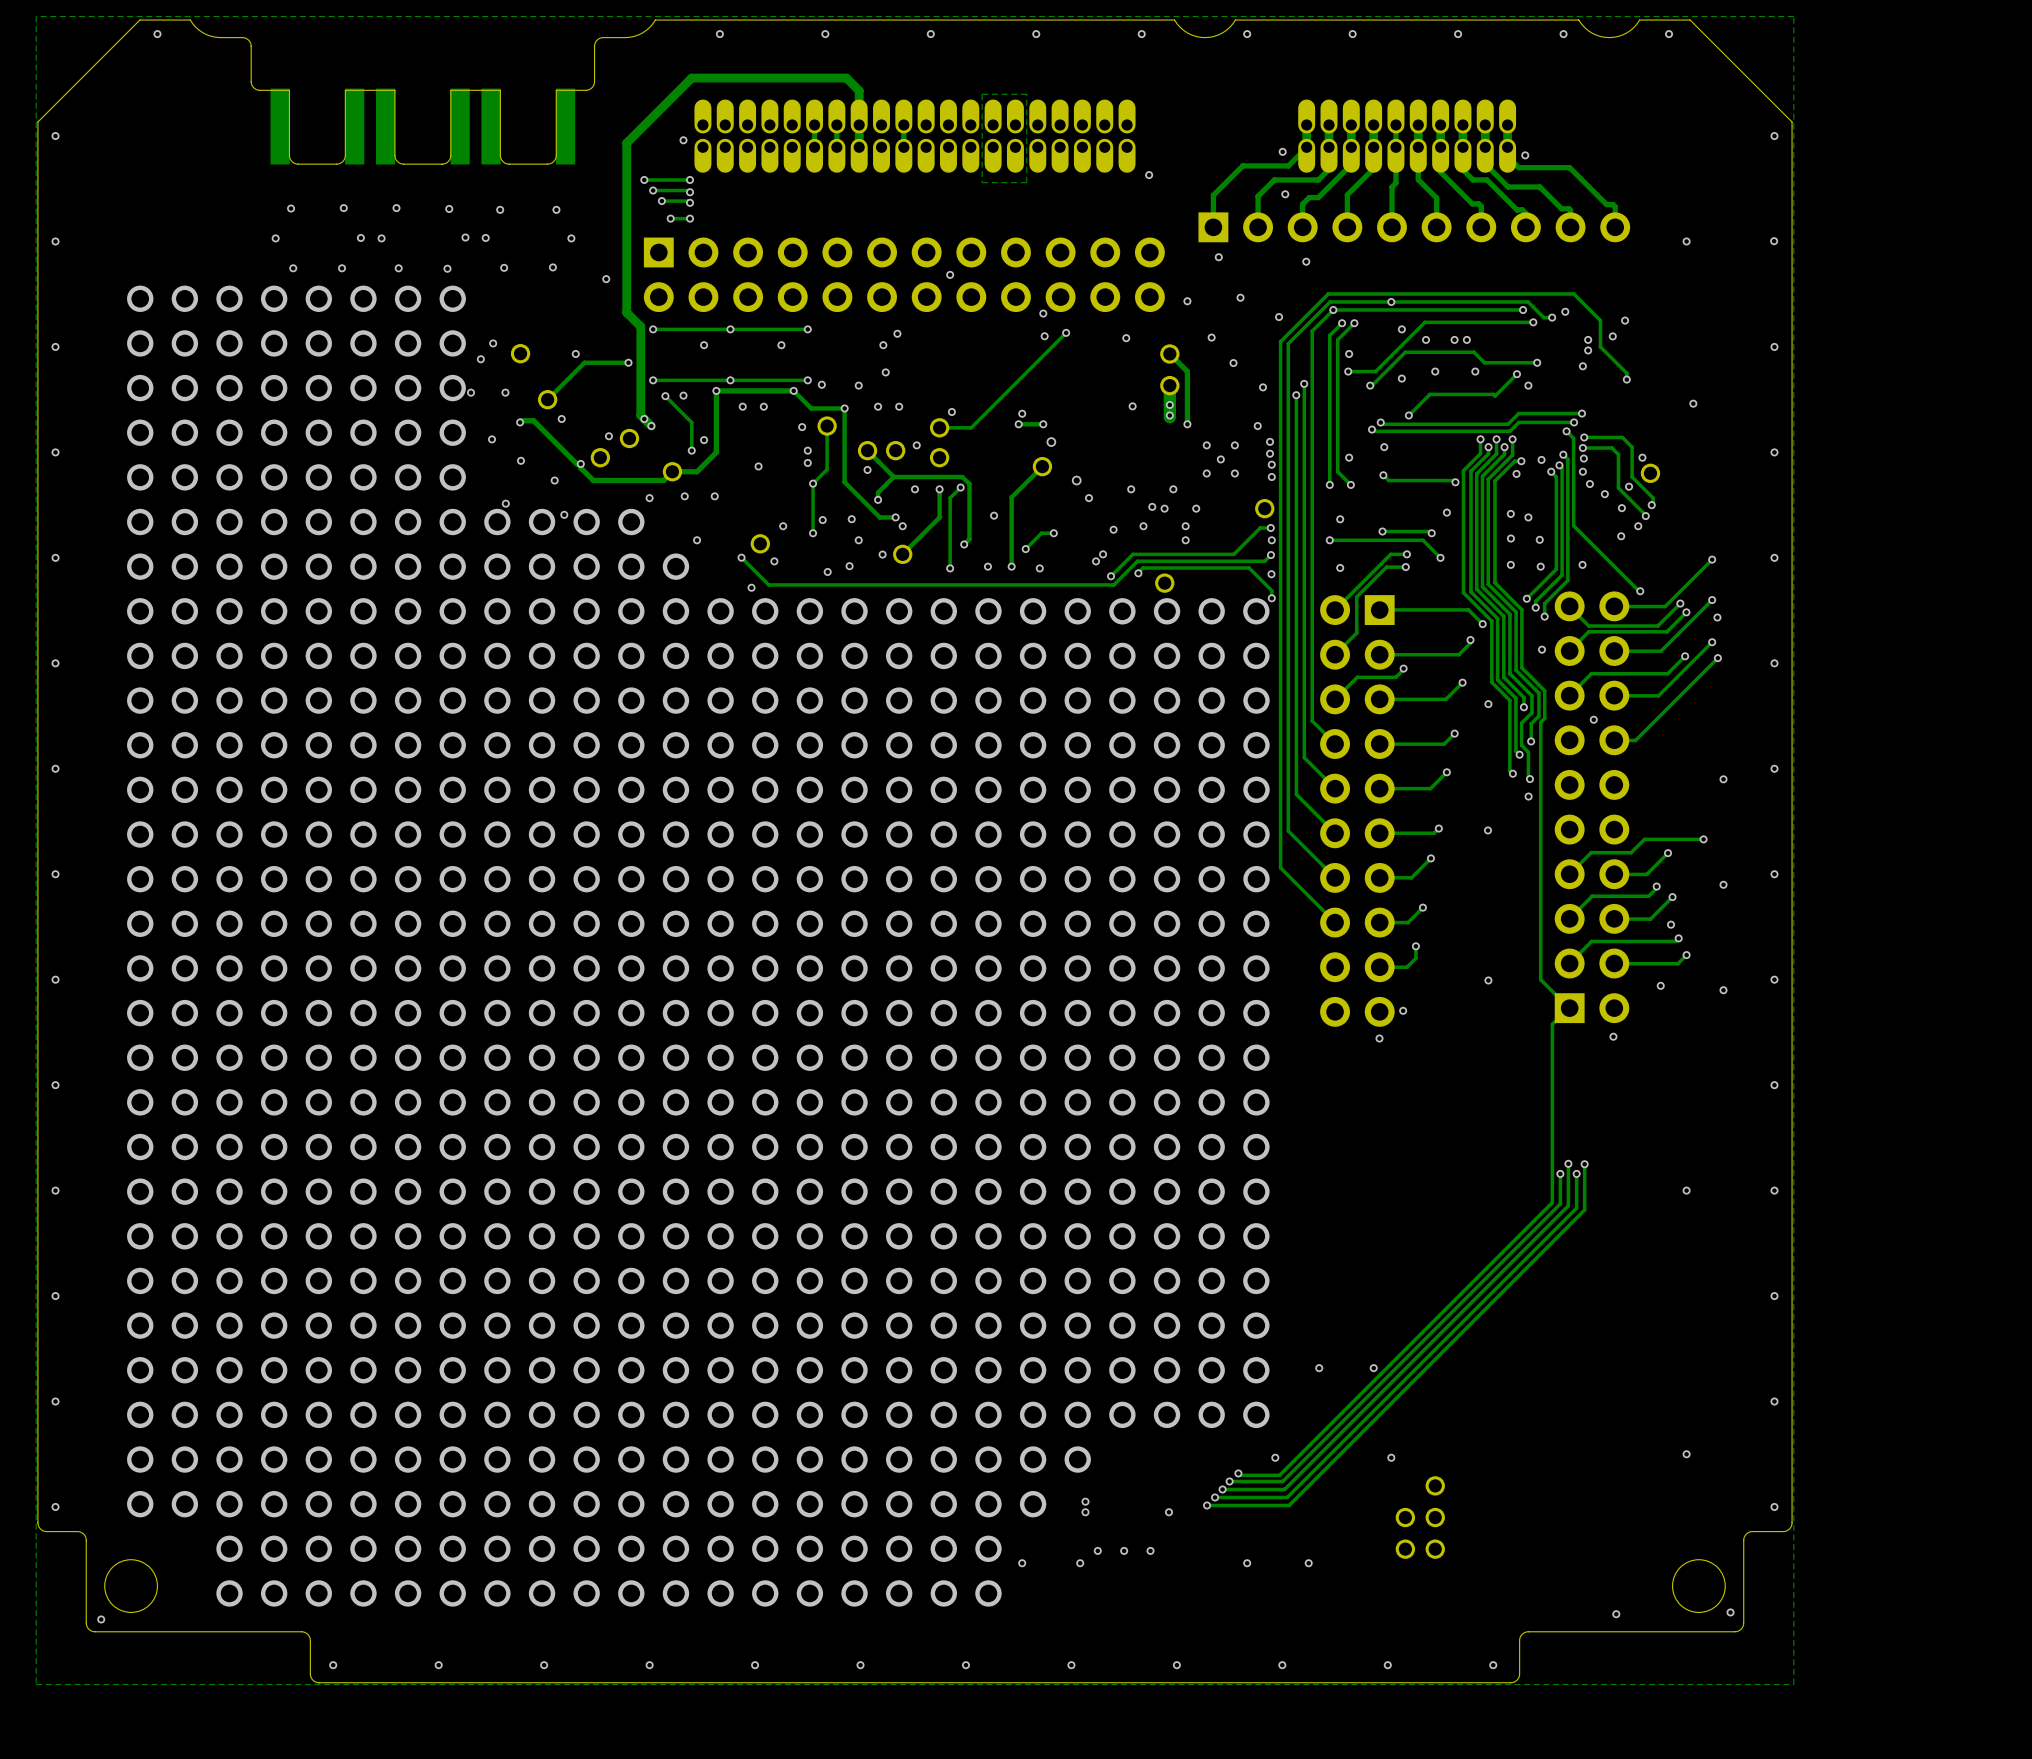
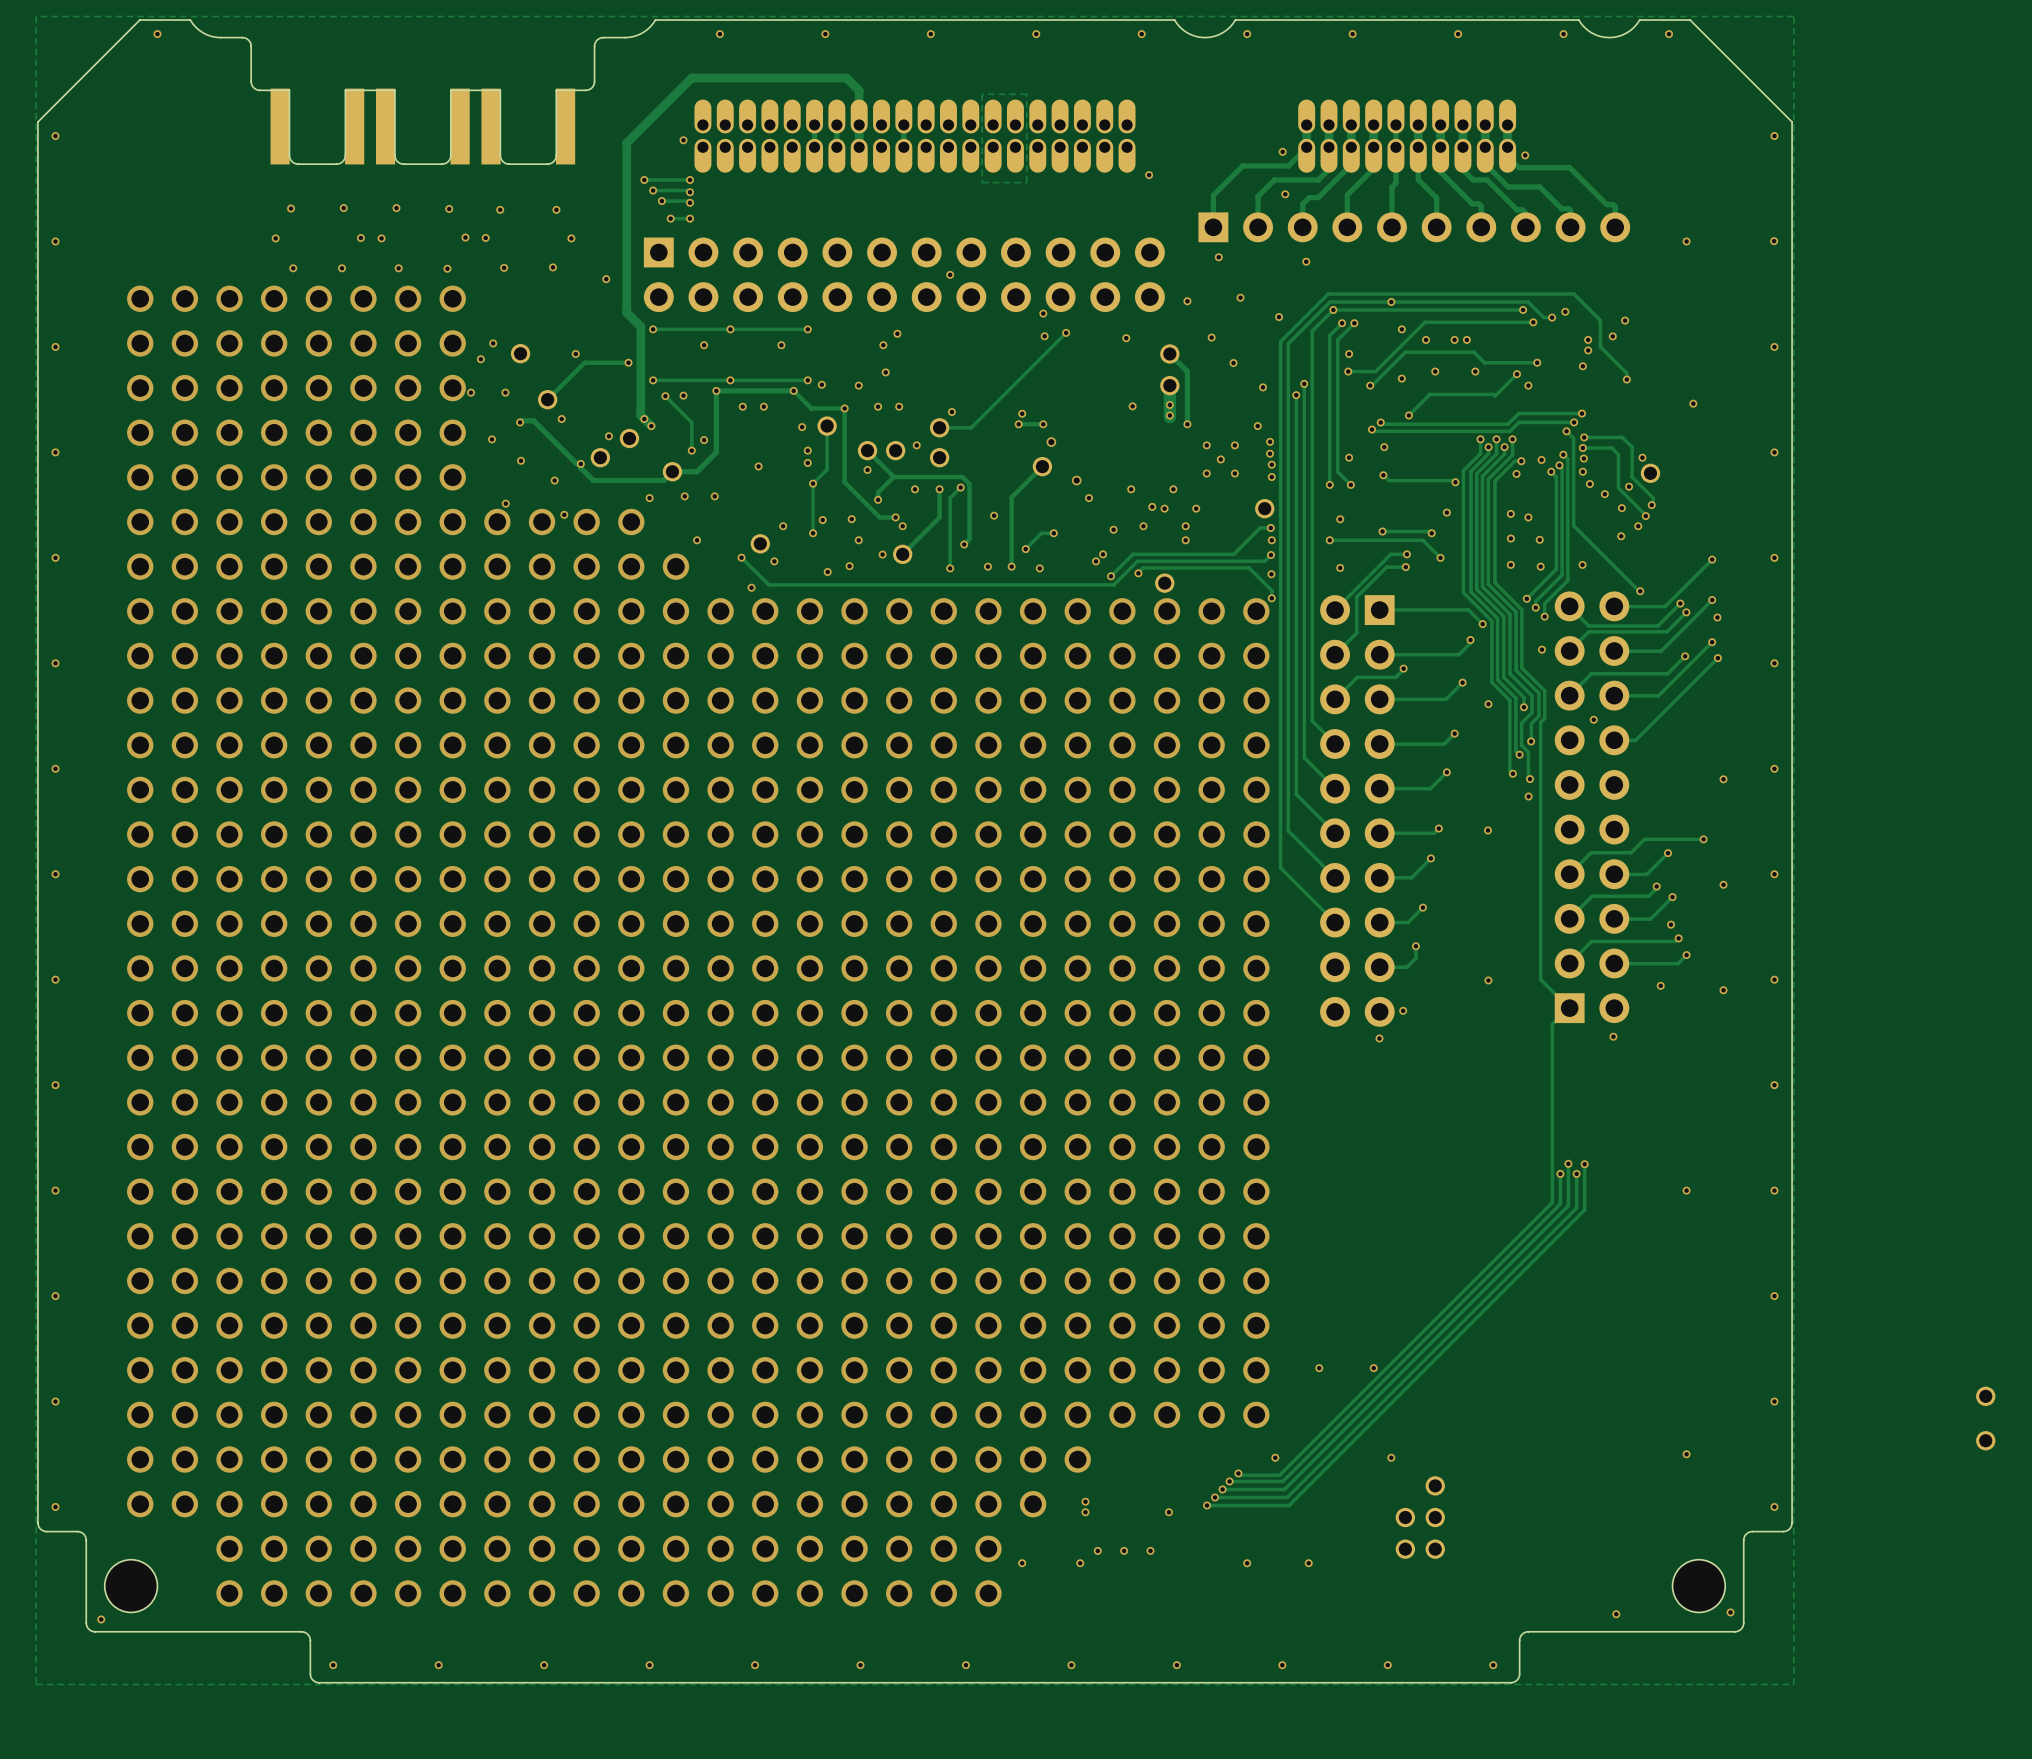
part: none -> (1985, 1396)
part: none -> (1985, 1440)

